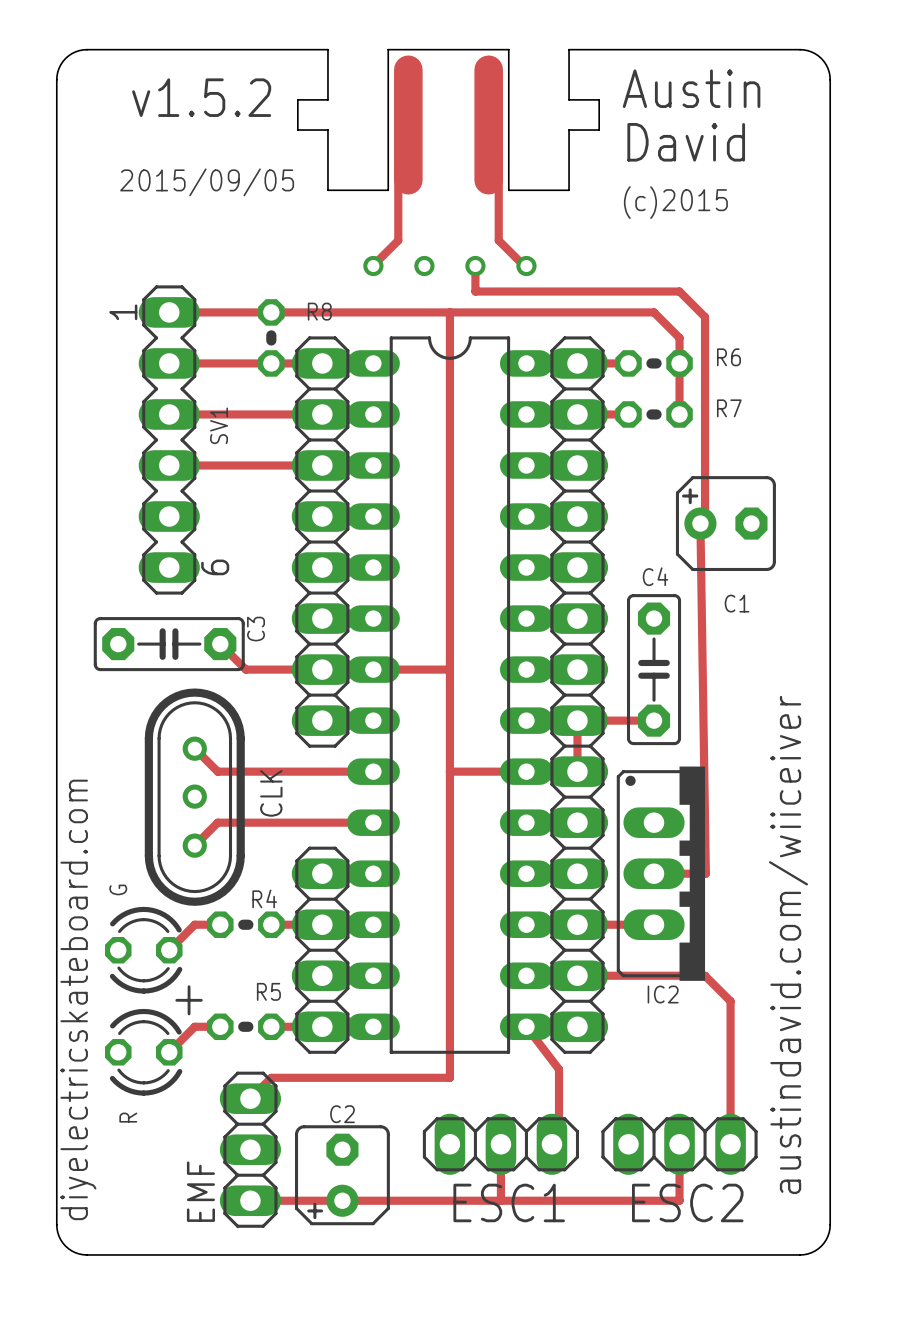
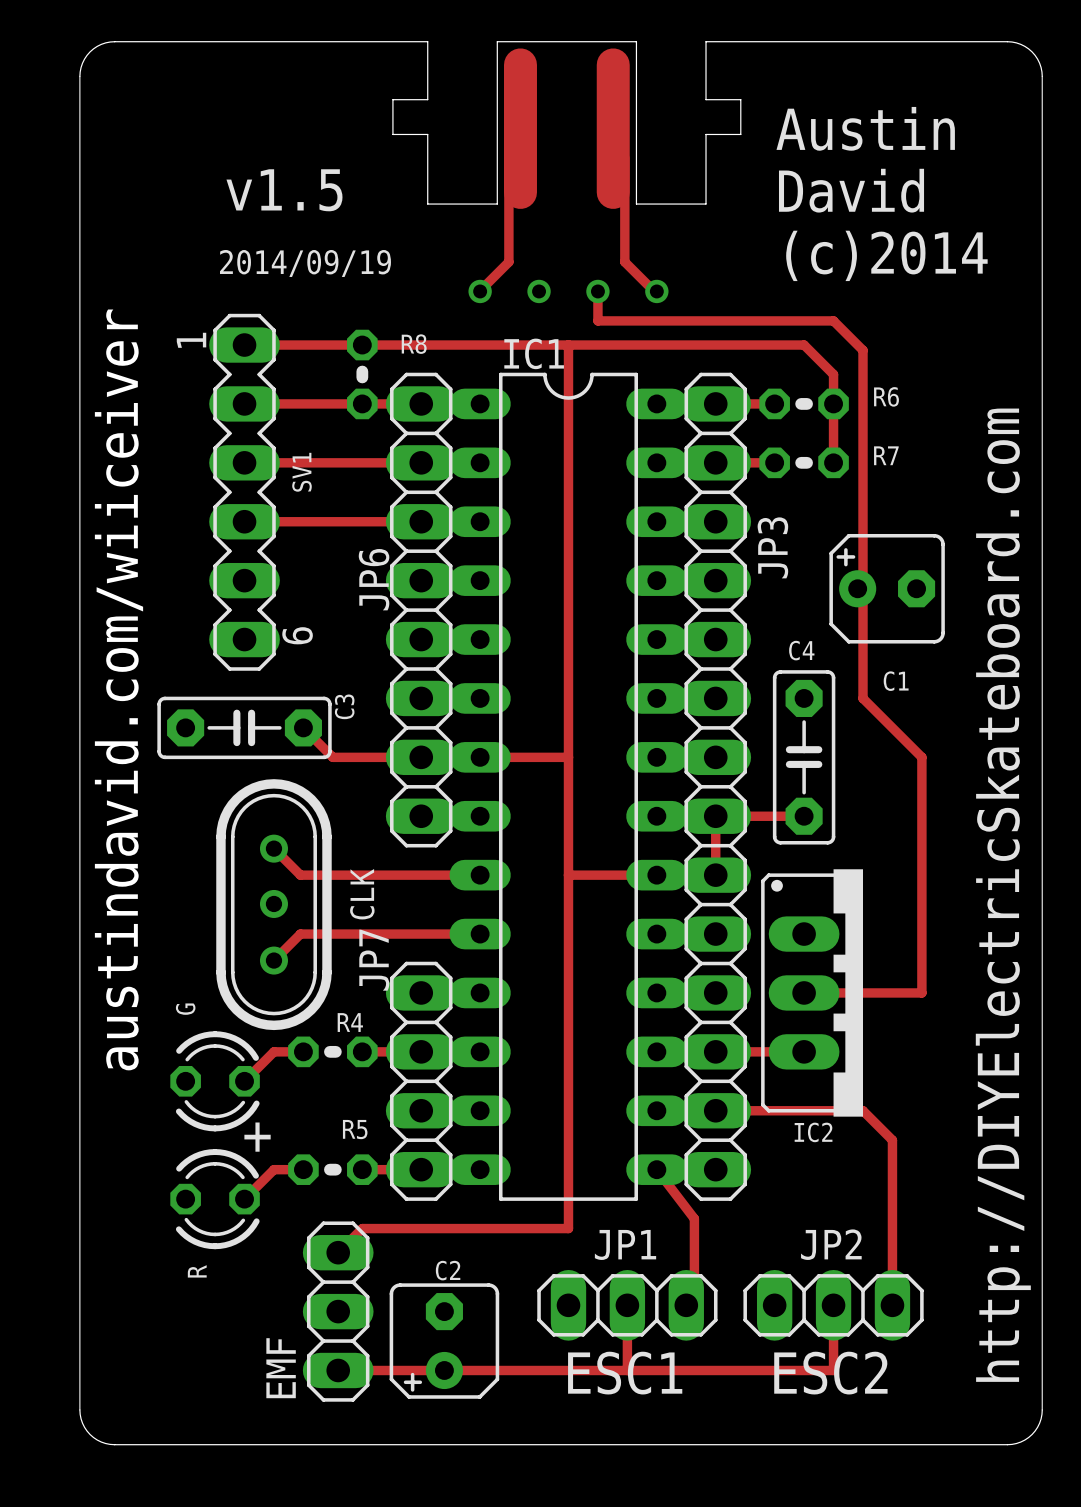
board edge: (86, 49) (75, 51) (65, 58) (59, 68) (56, 79) (56, 1224) (59, 1236) (65, 1246) (75, 1252) (86, 1254) (800, 1254) (815, 1250) (826, 1239) (830, 1224) (830, 79) (827, 68) (821, 58) (811, 51) (800, 49) -> (149, 41) (110, 42) (97, 46) (84, 59) (79, 76)
board edge: none -> (972, 41) (1012, 42) (1024, 46) (1037, 59) (1042, 76)
line: none -> (79, 76) (79, 1409)
line: none -> (1042, 76) (1042, 1409)
text position: Austin (691, 88) -> Austin (865, 128)
text: v1.5.2 (201, 97) -> none
text position: David (686, 142) -> David (851, 190)
text: none -> v1.5 (284, 190)
text: 2015/09/05 (207, 182) -> none
text: (c)2015 (675, 202) -> (c)2014 (886, 255)
text: none -> 2014/09/19 (305, 263)
IC1 name: none -> IC1 (534, 353)
JP3 name: none -> JP3 (772, 547)
track: (705, 518) (700, 523) (705, 873) -> (863, 582) (863, 698) (921, 757) (921, 992) (863, 992)
JP6 name: none -> JP6 (374, 579)
text: none -> austindavid.com/wiiceiver (118, 689)
text: none -> http://DIYElectricSkateboard.com (1003, 895)
JP7 name: none -> JP7 (374, 960)
text: austindavid.com/wiiceiver (788, 944) -> none
text: diyelectricskateboard.com (78, 999) -> none
JP1 name: none -> JP1 (625, 1244)
JP2 name: none -> JP2 (831, 1244)
board edge: none -> (79, 1409) (82, 1423) (90, 1434) (101, 1442) (114, 1444) (1007, 1444) (1020, 1442) (1032, 1434) (1039, 1423) (1042, 1409)

